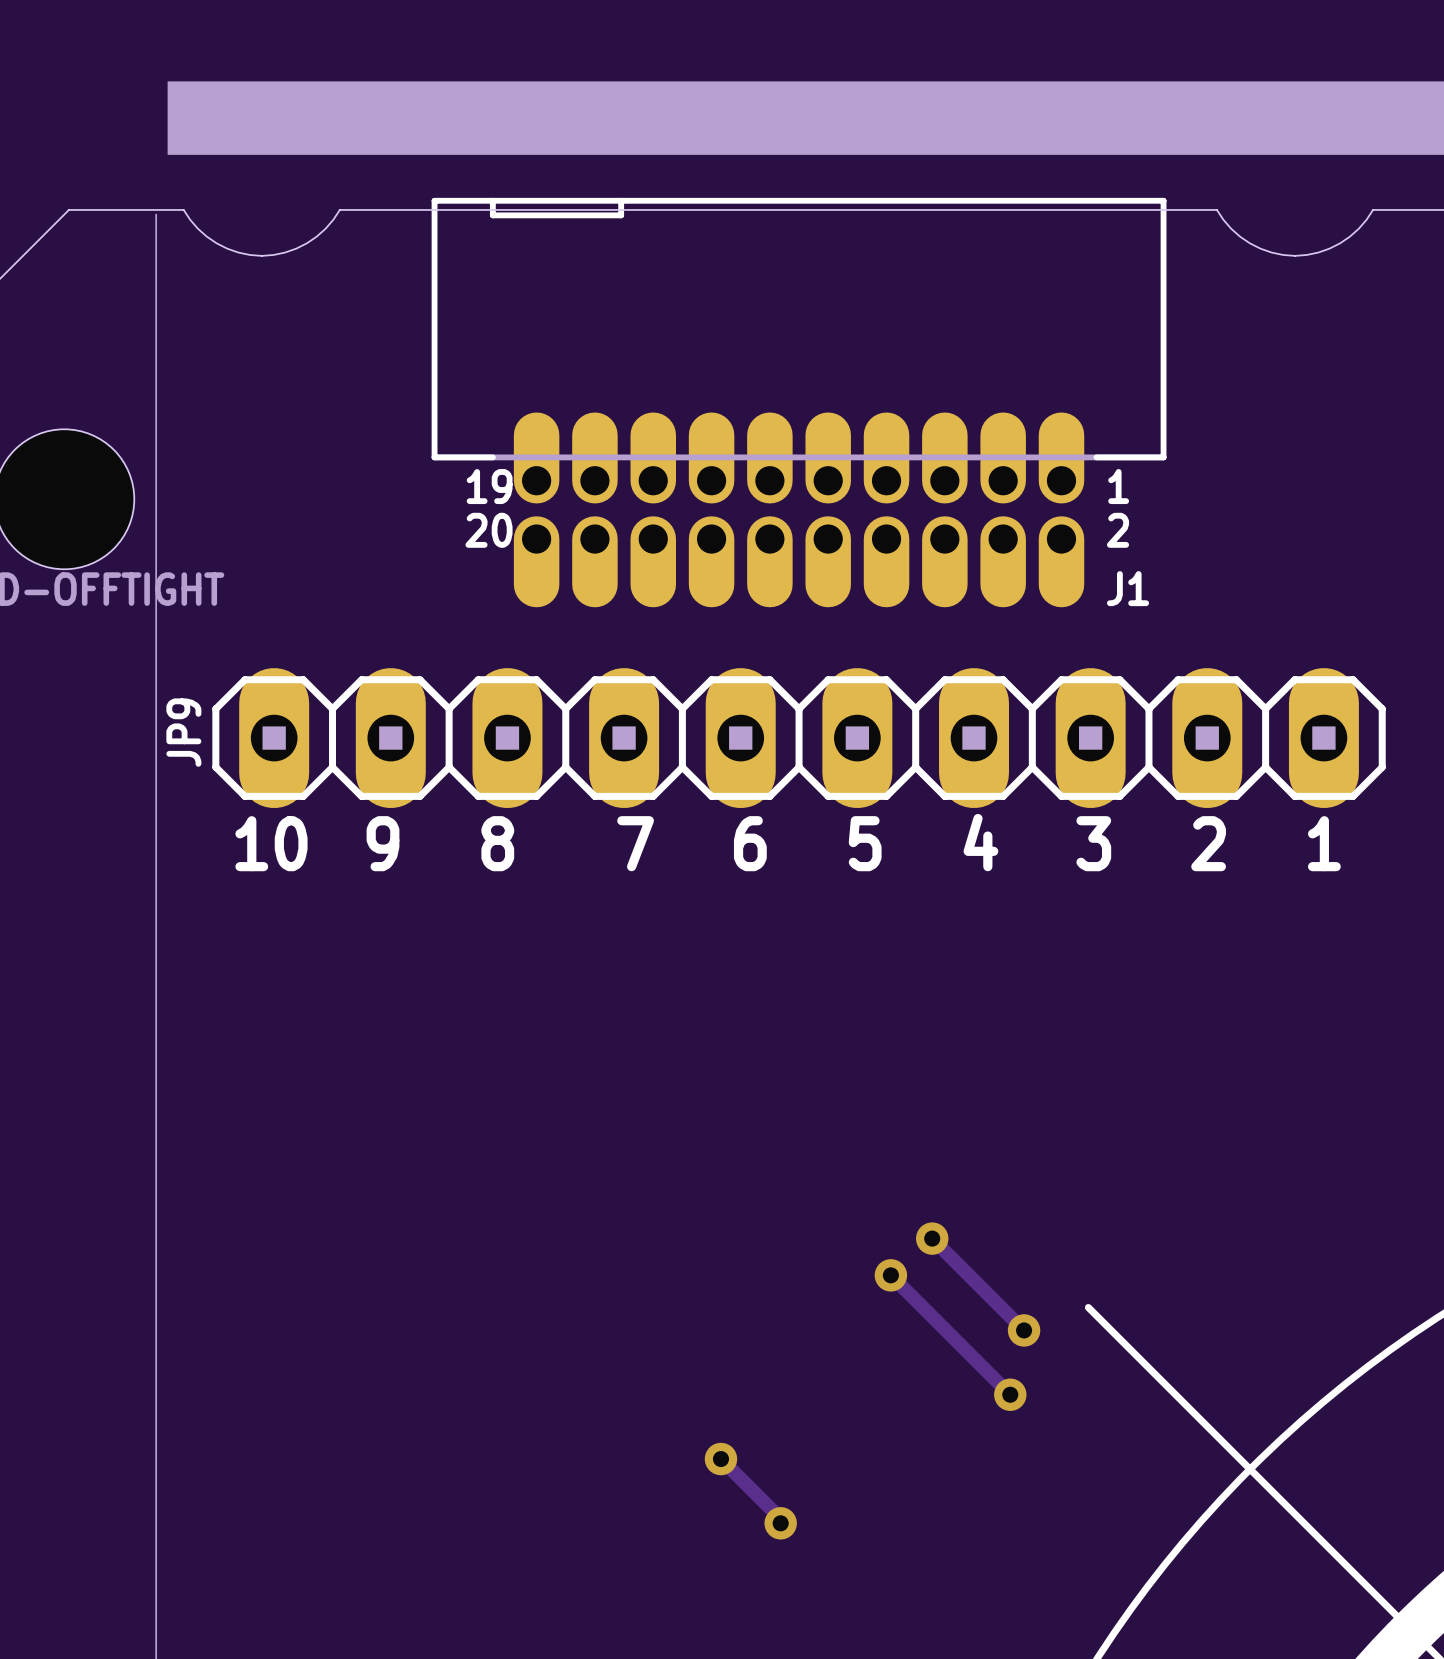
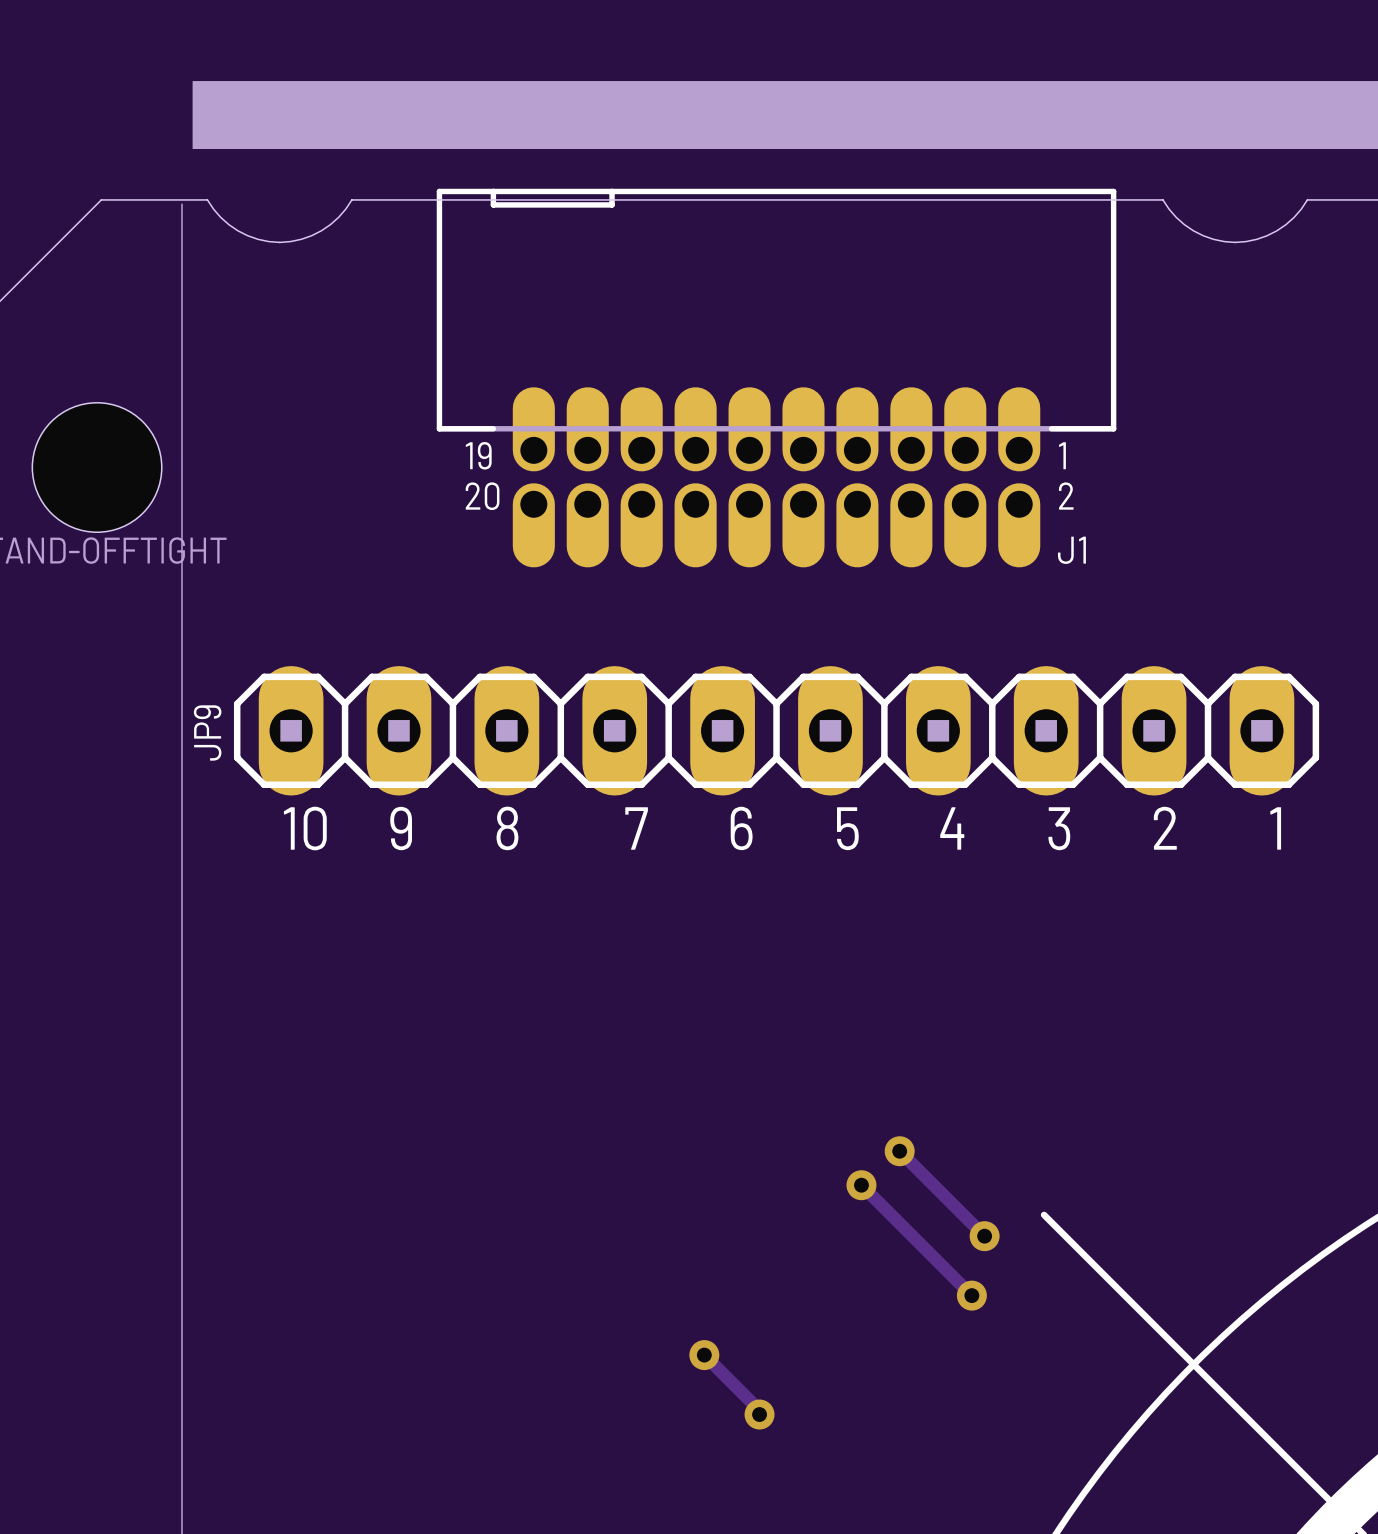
JP9 position: (799, 738) -> (776, 730)
text position: 4 (980, 842) -> 4 (952, 828)
text position: 10 (271, 843) -> 10 (305, 828)
text position: 9 (382, 843) -> 9 (401, 828)
text position: 8 (497, 843) -> 8 (507, 828)
text position: 7 (635, 843) -> 7 (636, 828)
text position: 6 (750, 843) -> 6 (741, 828)
text position: 5 (865, 843) -> 5 (847, 828)
text position: 3 (1093, 843) -> 3 (1059, 828)
text position: 2 (1208, 843) -> 2 (1165, 828)
text position: 1 (1324, 843) -> 1 (1275, 828)

